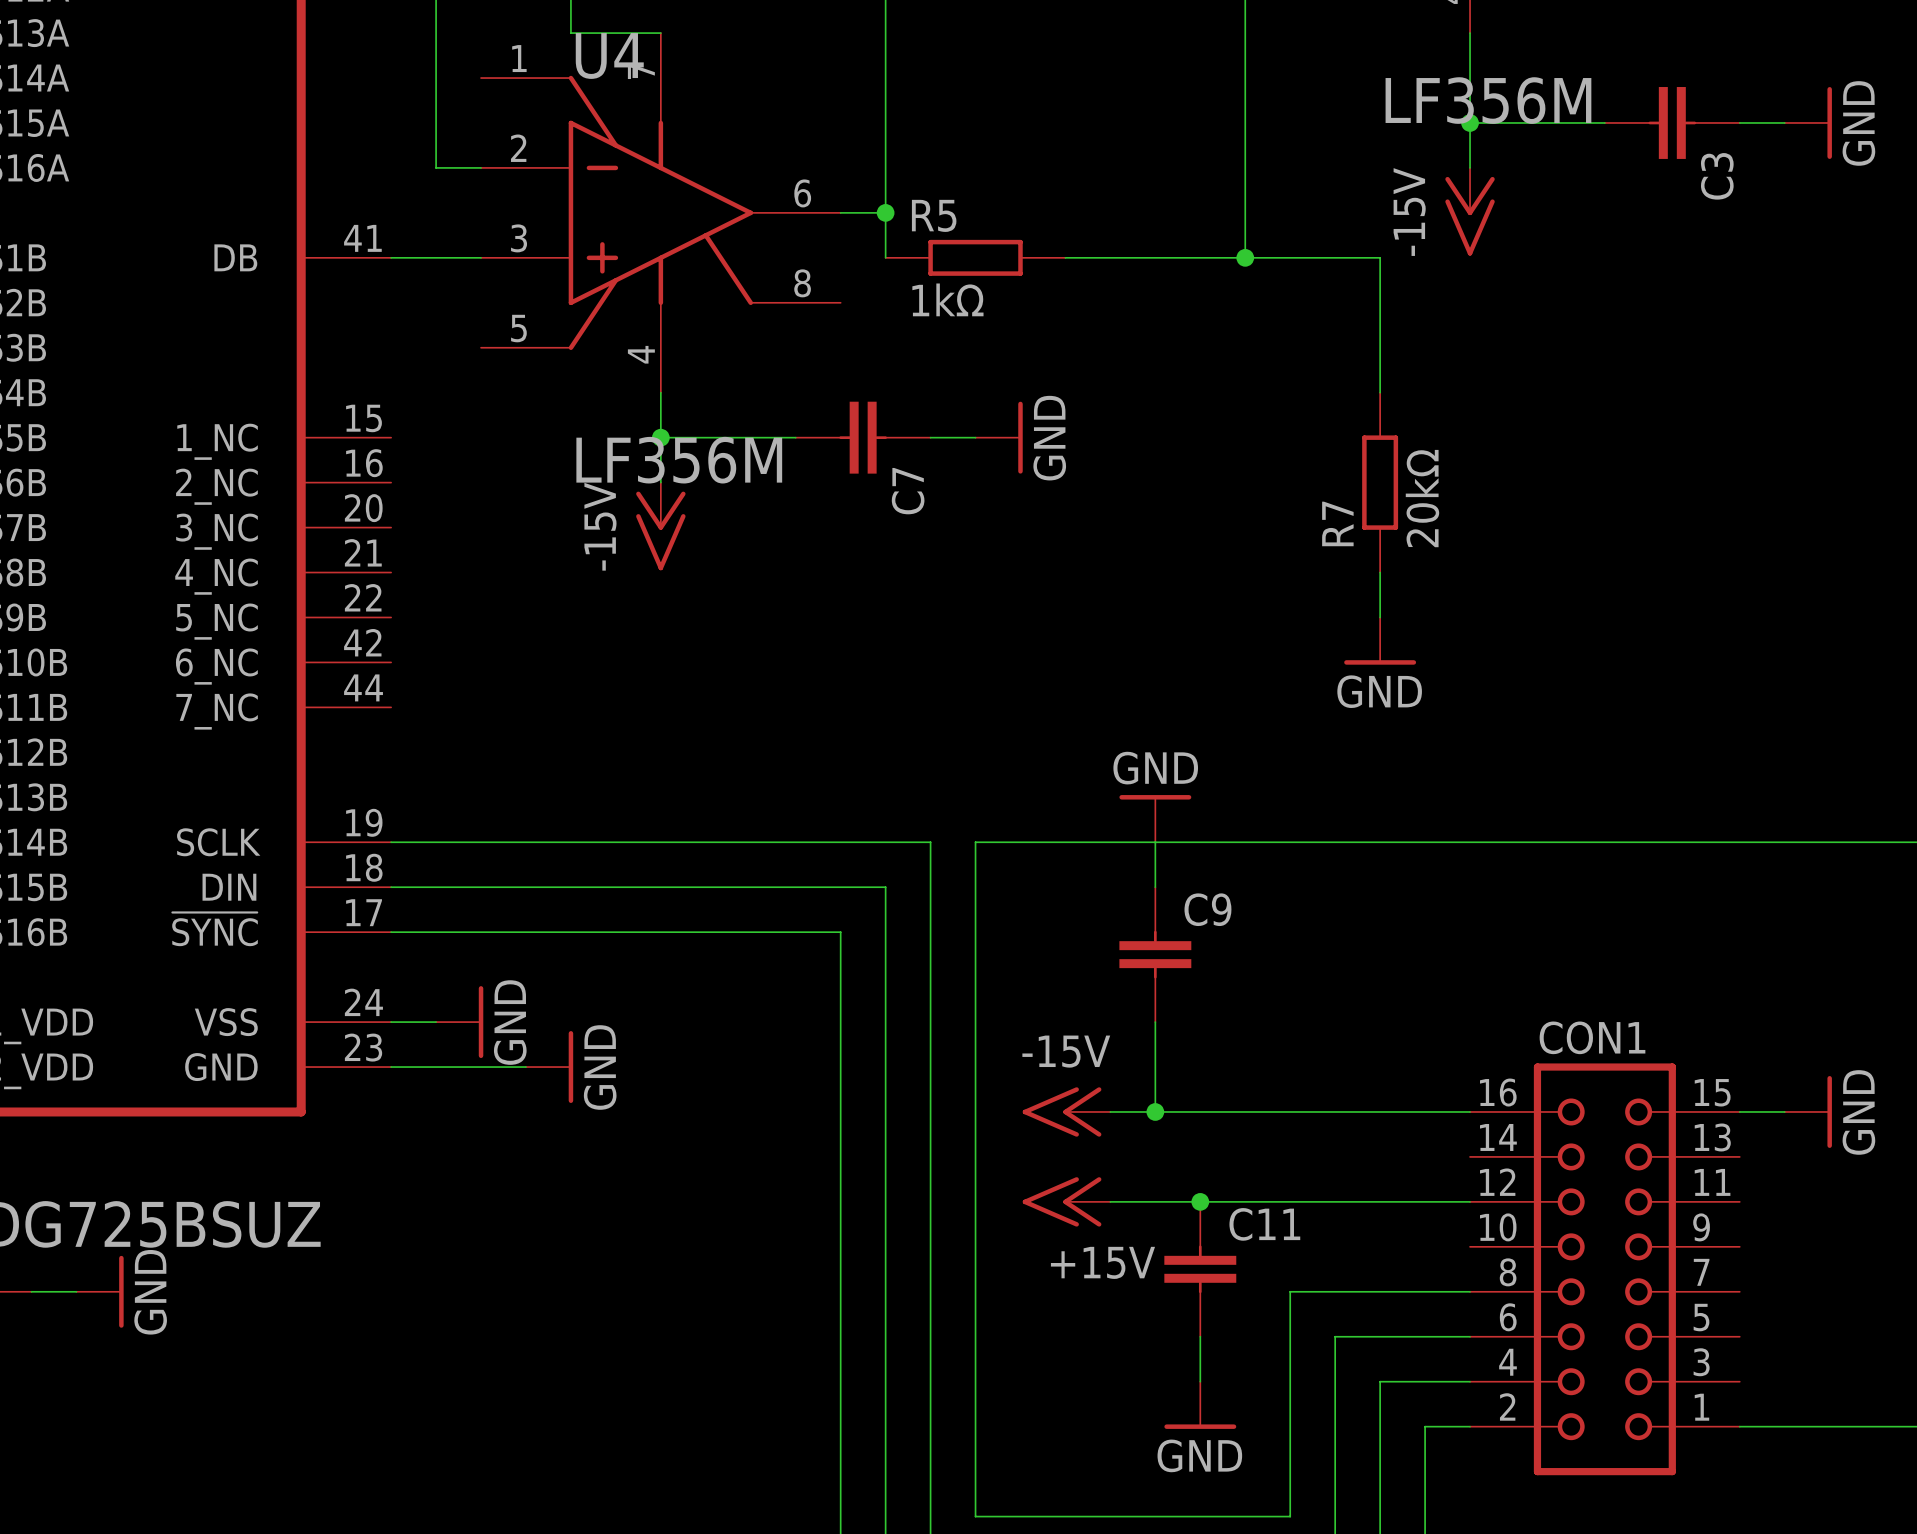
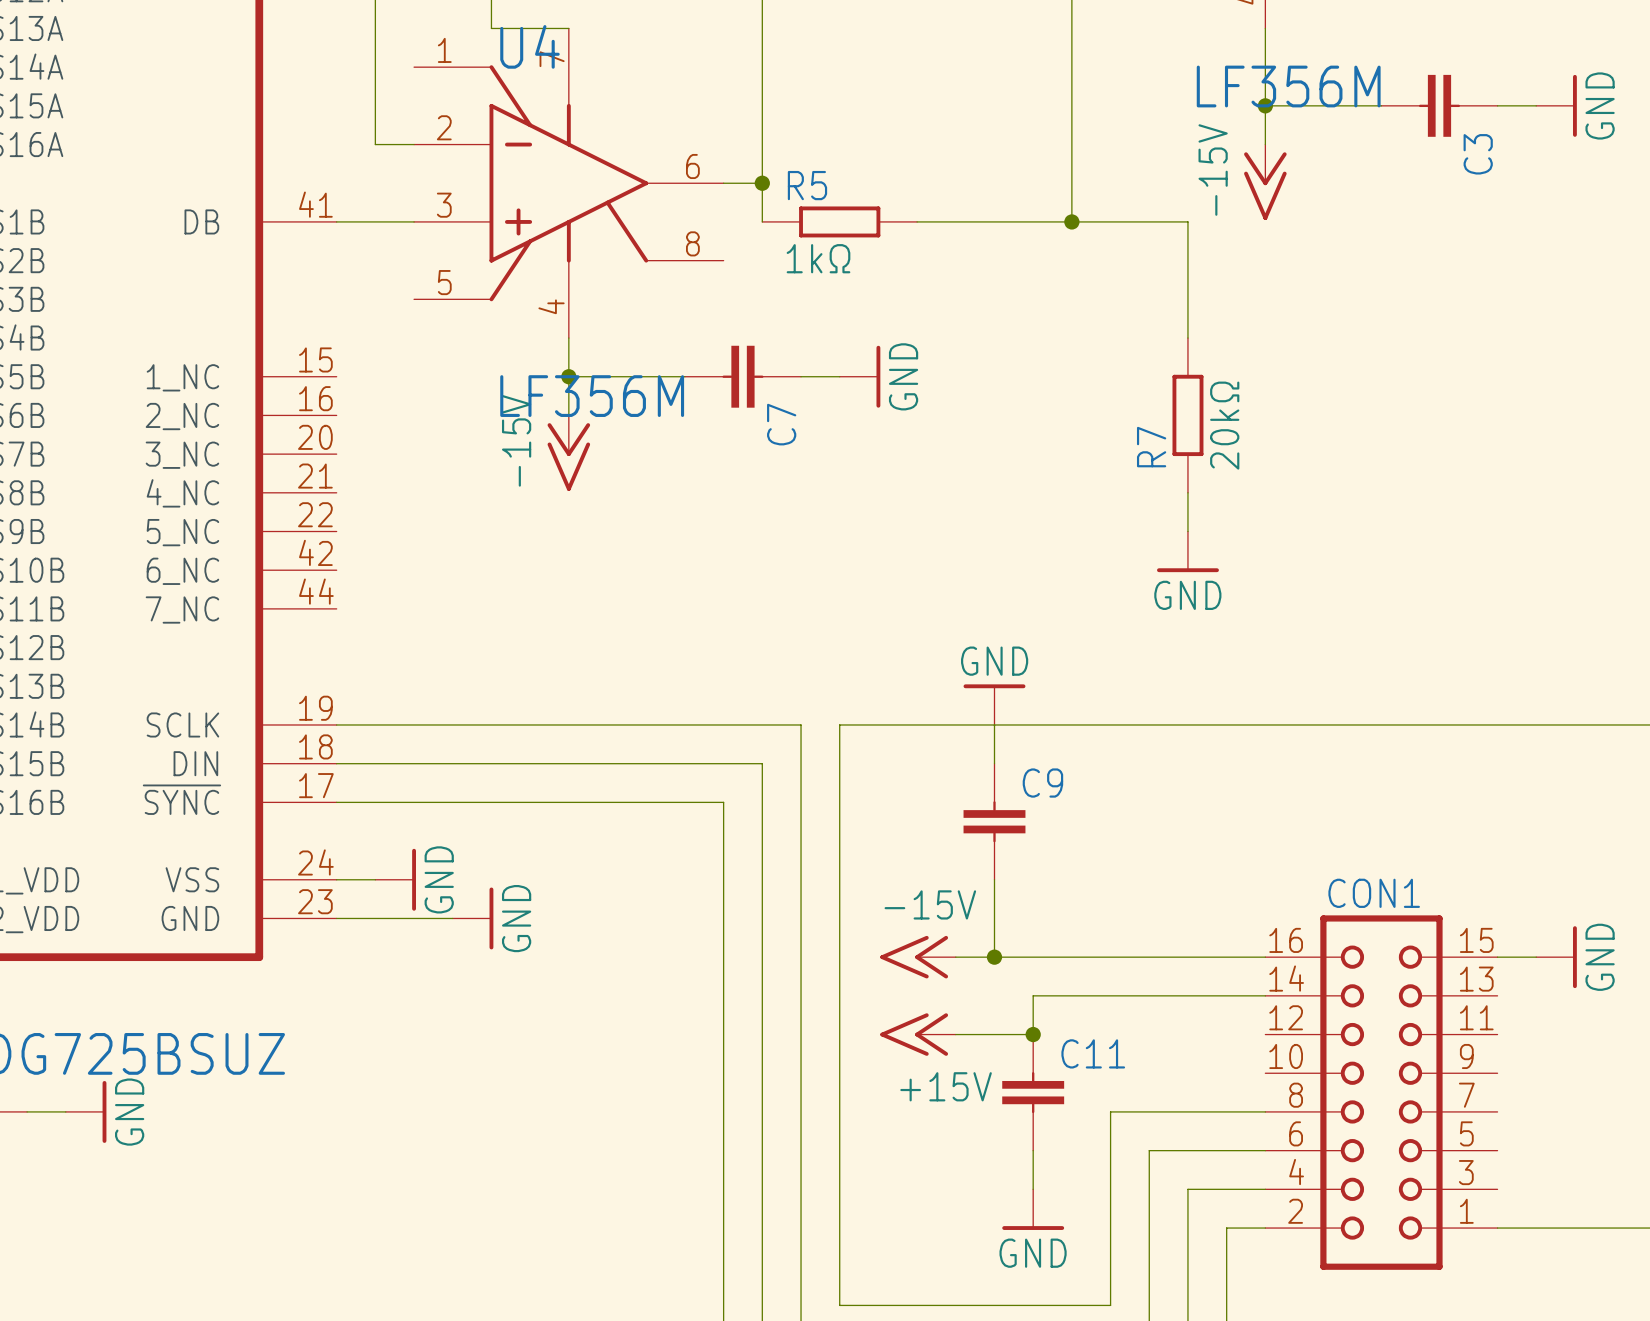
wire: (1200, 1201) (1470, 1201) -> (1033, 1034) (1033, 995) (1265, 995)

